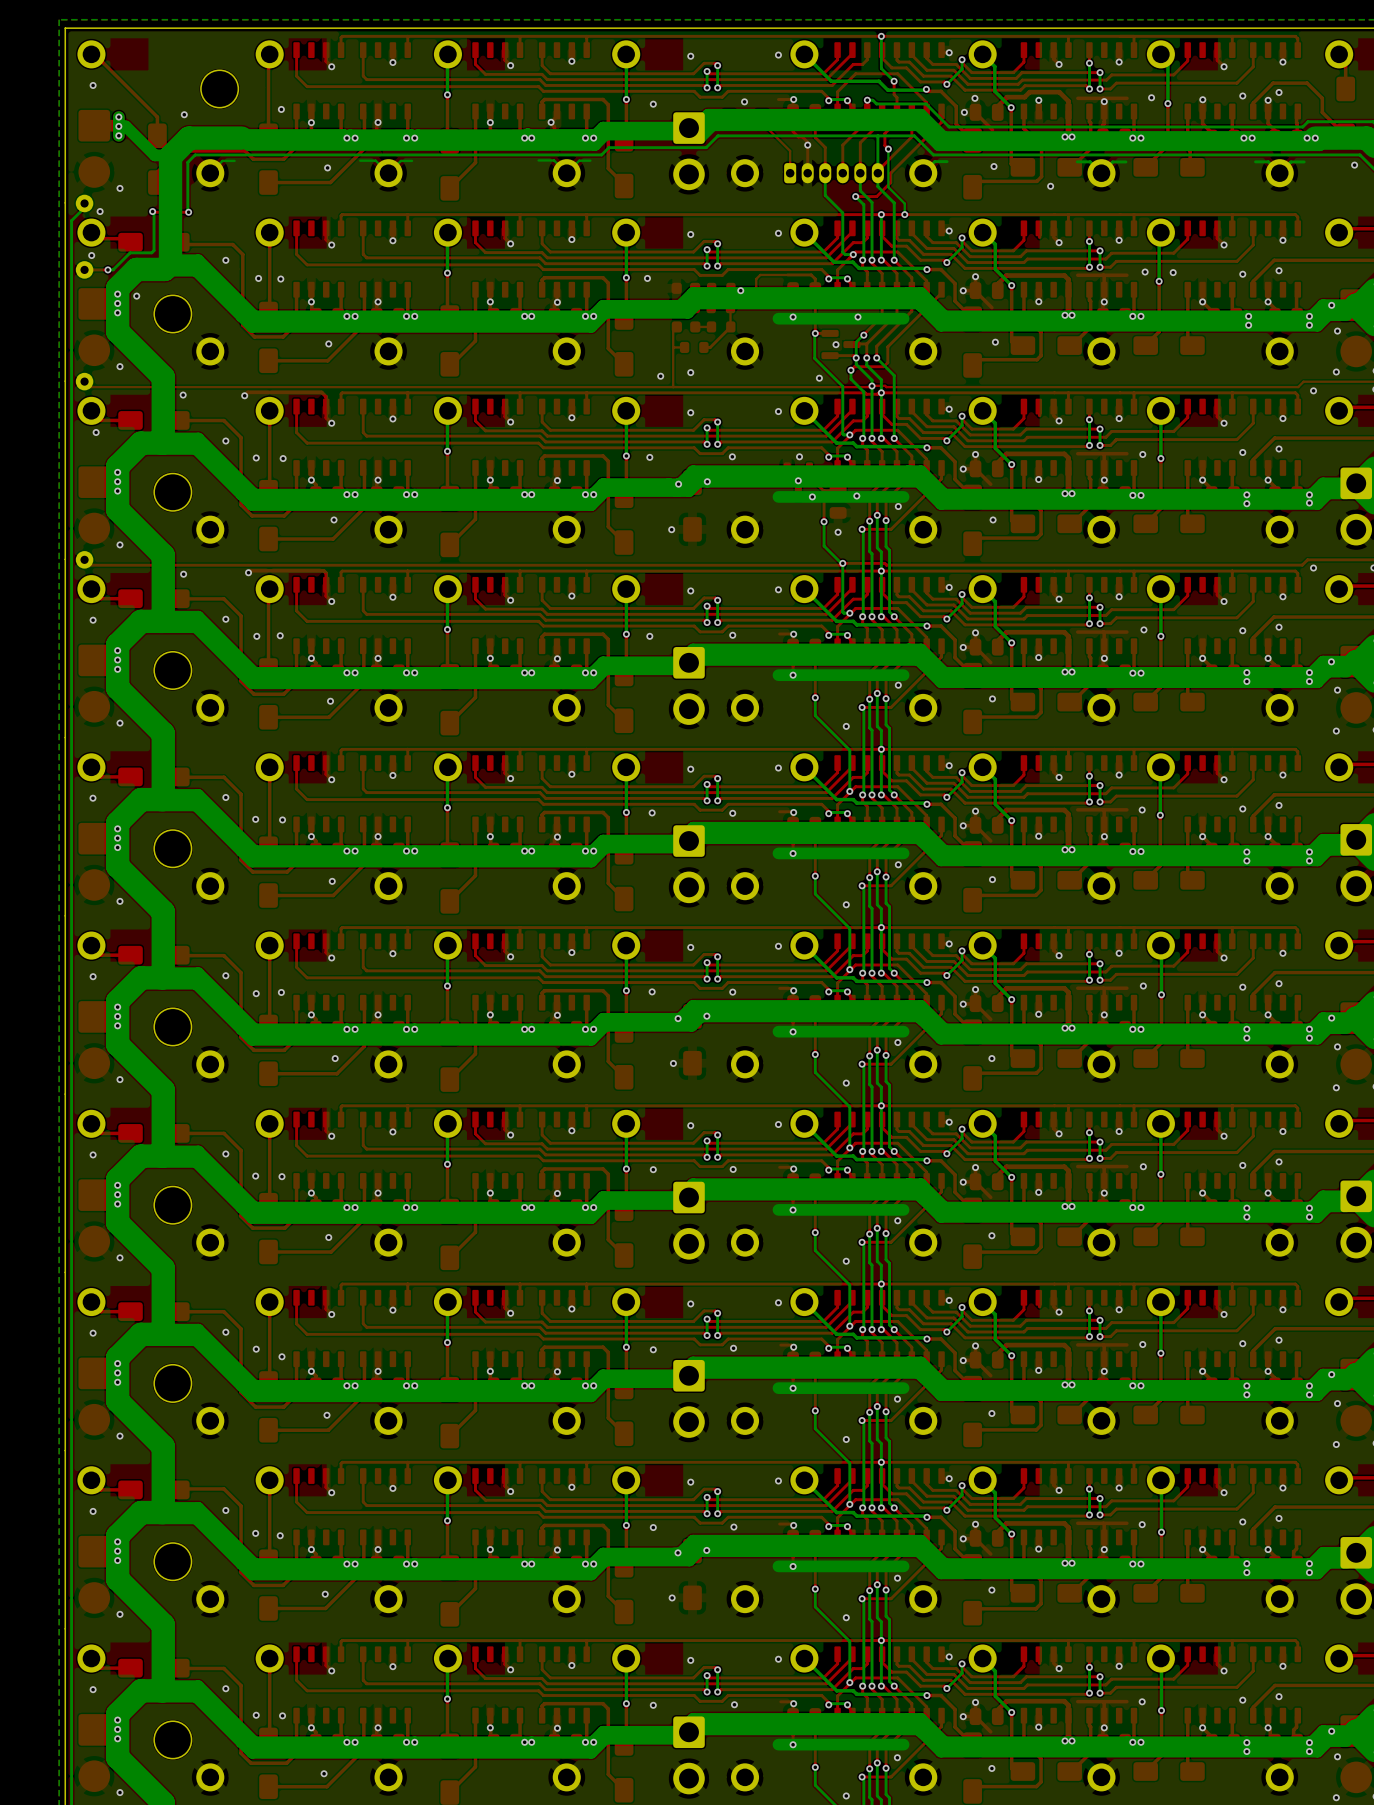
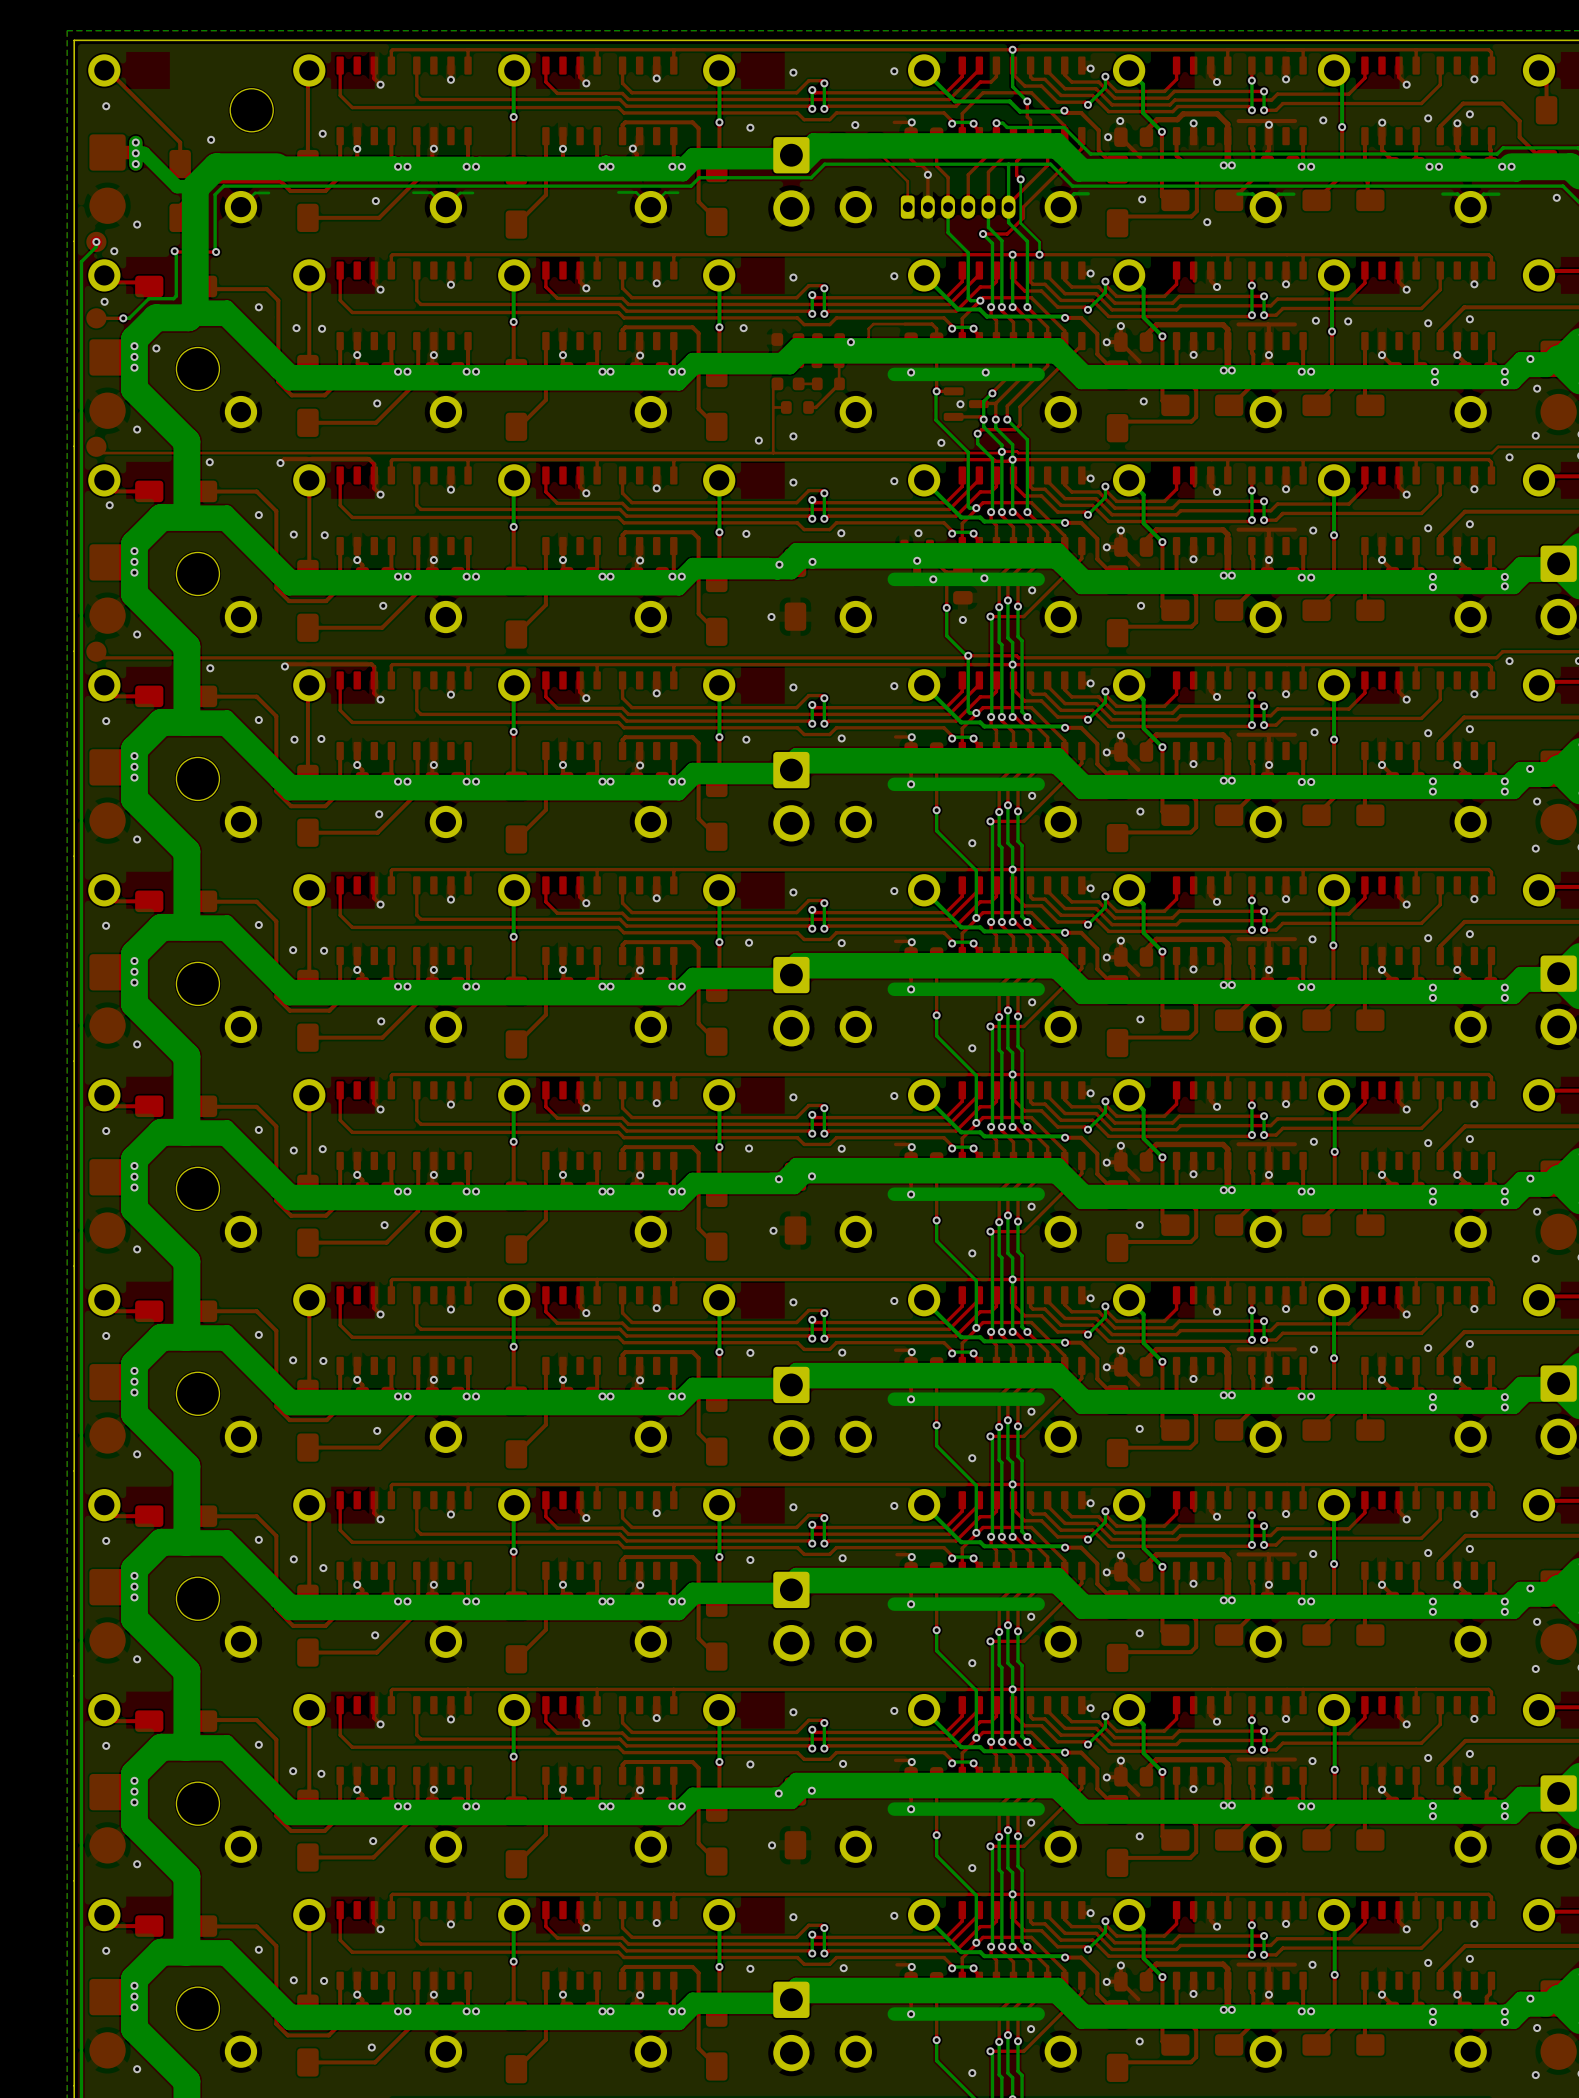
part footprint: [75, 194, 94, 213] -> [86, 231, 107, 253]
via: none -> (96, 241)
part footprint: [75, 261, 94, 279] -> [86, 308, 107, 329]
part footprint: [75, 372, 94, 391] -> [86, 436, 107, 457]
part footprint: [75, 551, 94, 569] -> [86, 641, 107, 662]

